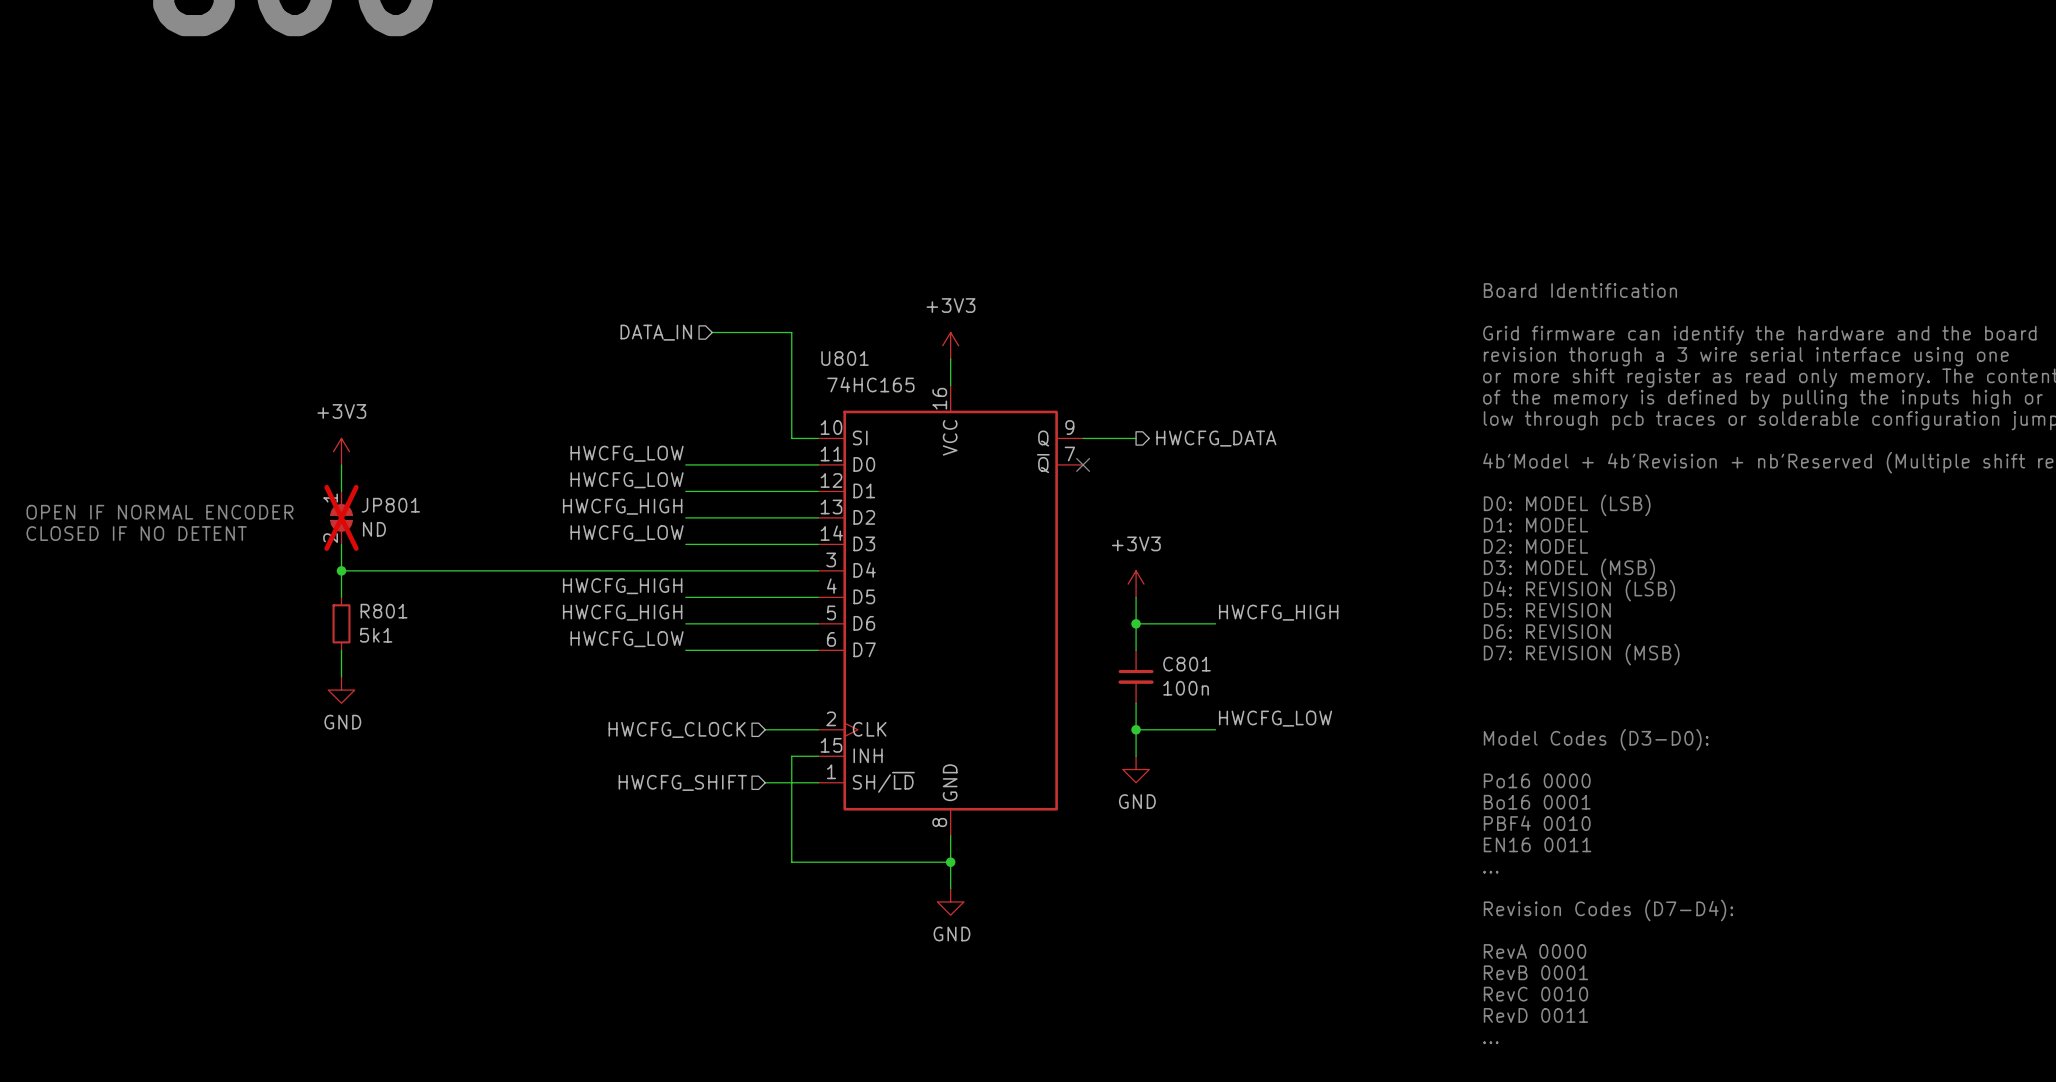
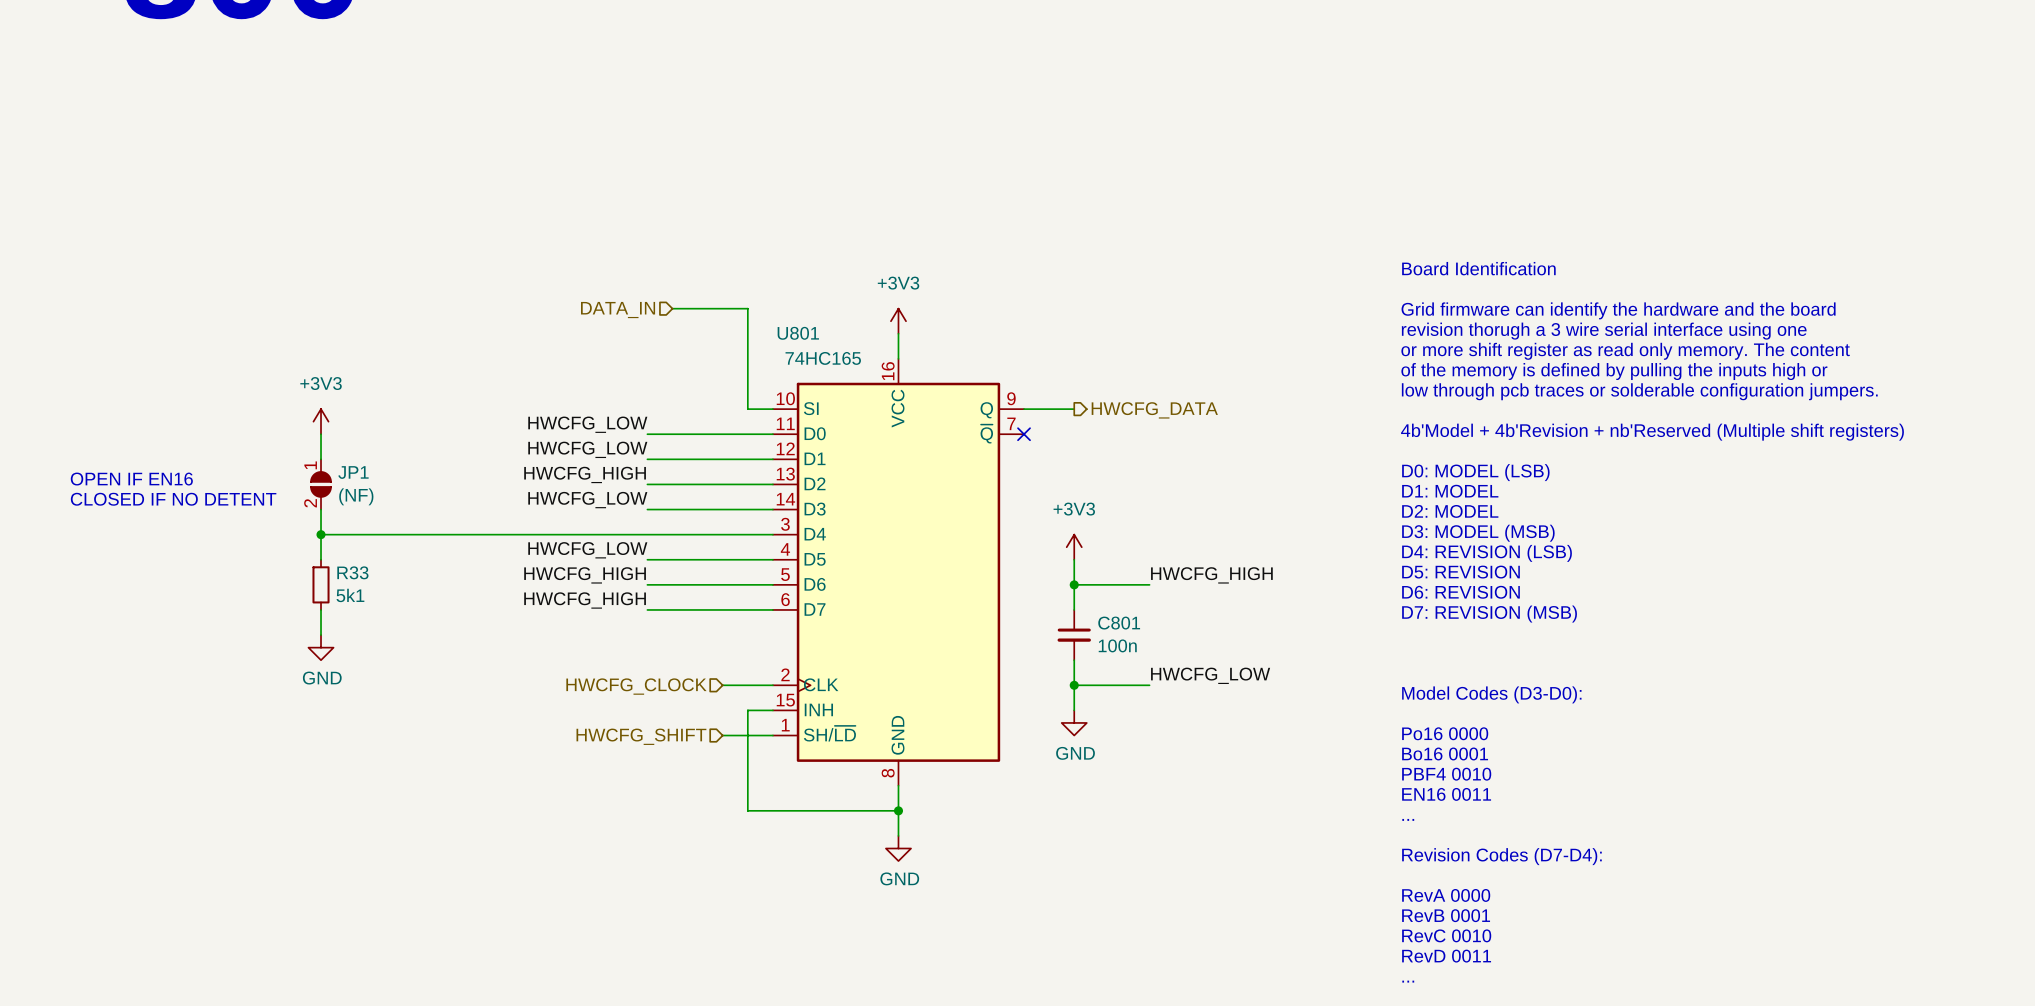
JP801 name: JP801 (390, 505) -> JP1 (353, 472)
text: none -> OPEN IF EN16 (131, 479)
text: OPEN IF NORMAL ENCODER (159, 512) -> none
JP801 do-not-place cross: (341, 517) -> none
JP801 value: ND (374, 529) -> (NF) (356, 496)
text position: CLOSED IF NO DETENT (136, 533) -> CLOSED IF NO DETENT (173, 499)
label: HWCFG_HIGH (622, 586) -> HWCFG_LOW (587, 550)
R801 name: R801 (384, 611) -> R33 (352, 572)
label: HWCFG_LOW (627, 639) -> HWCFG_HIGH (585, 600)

